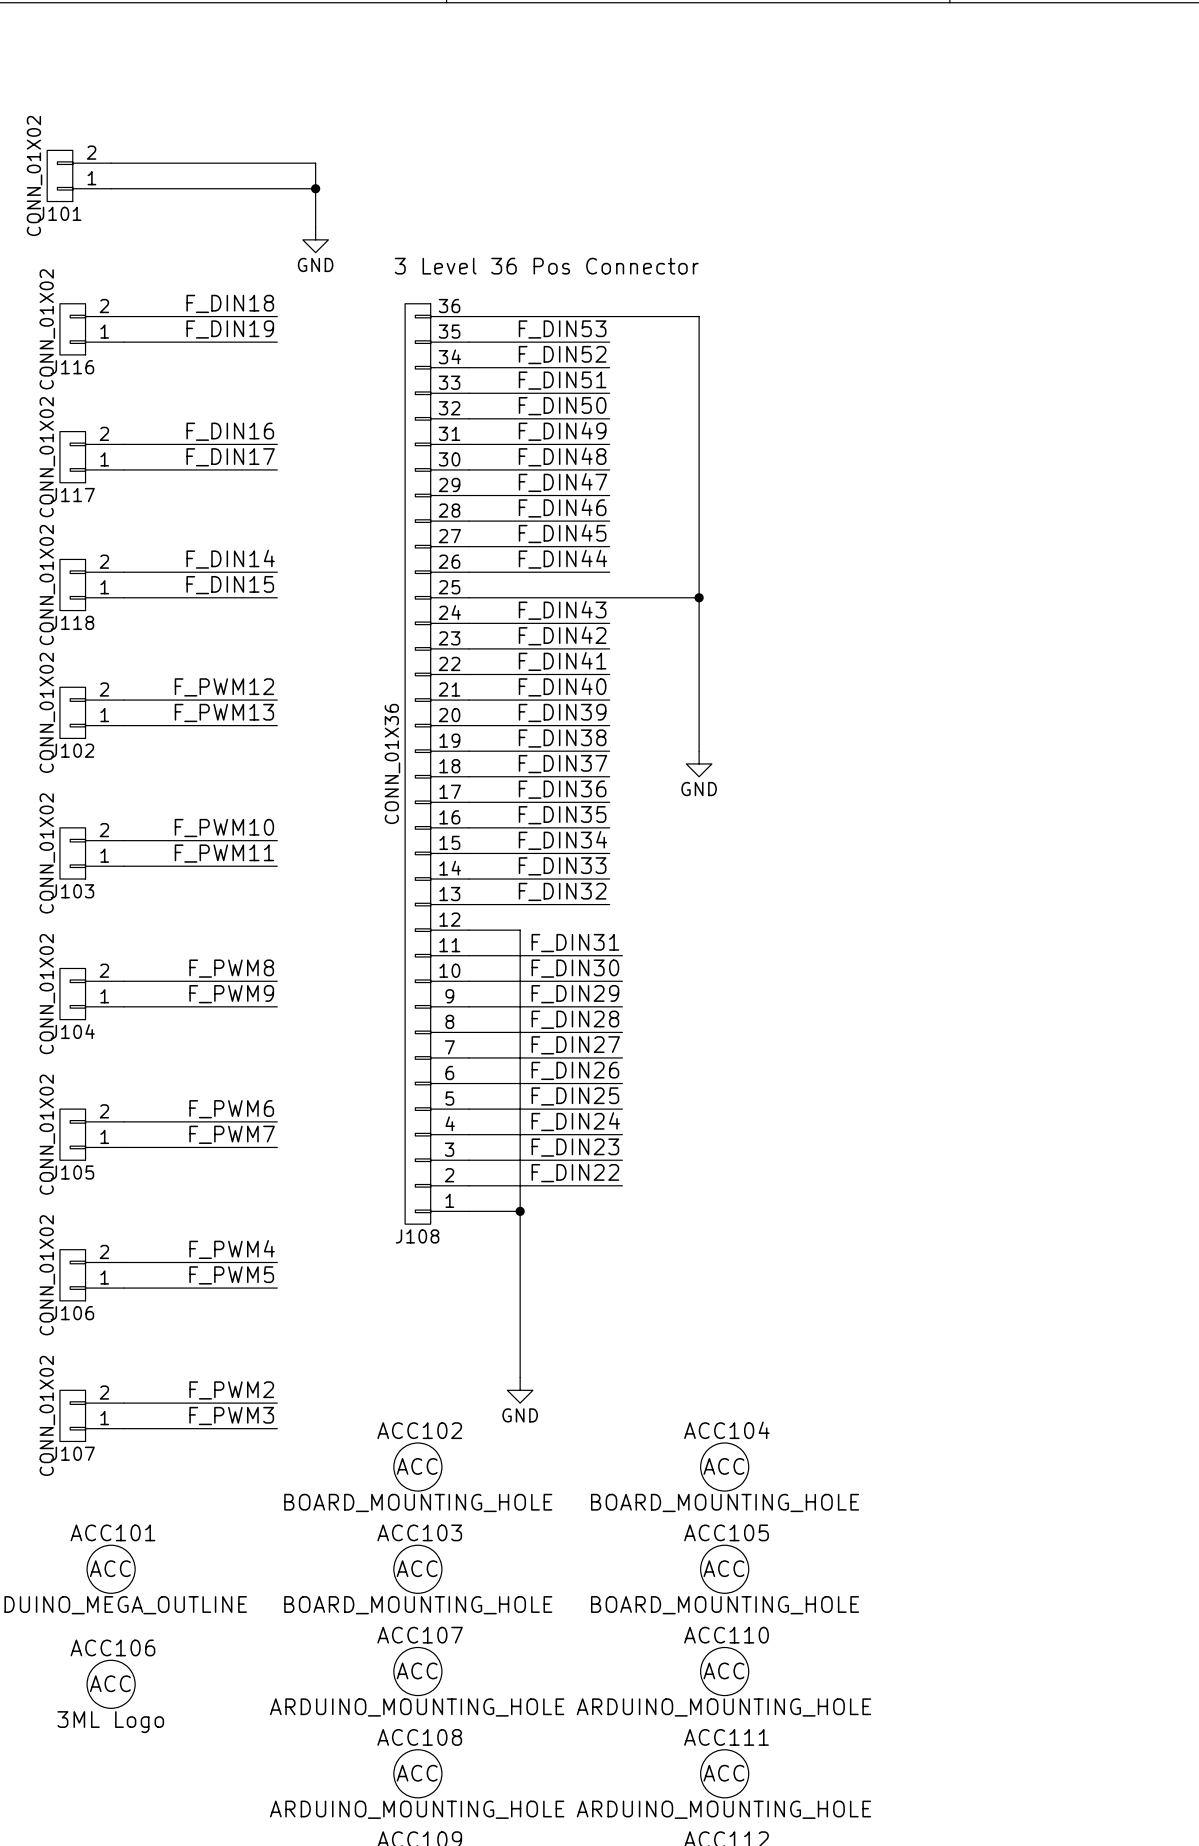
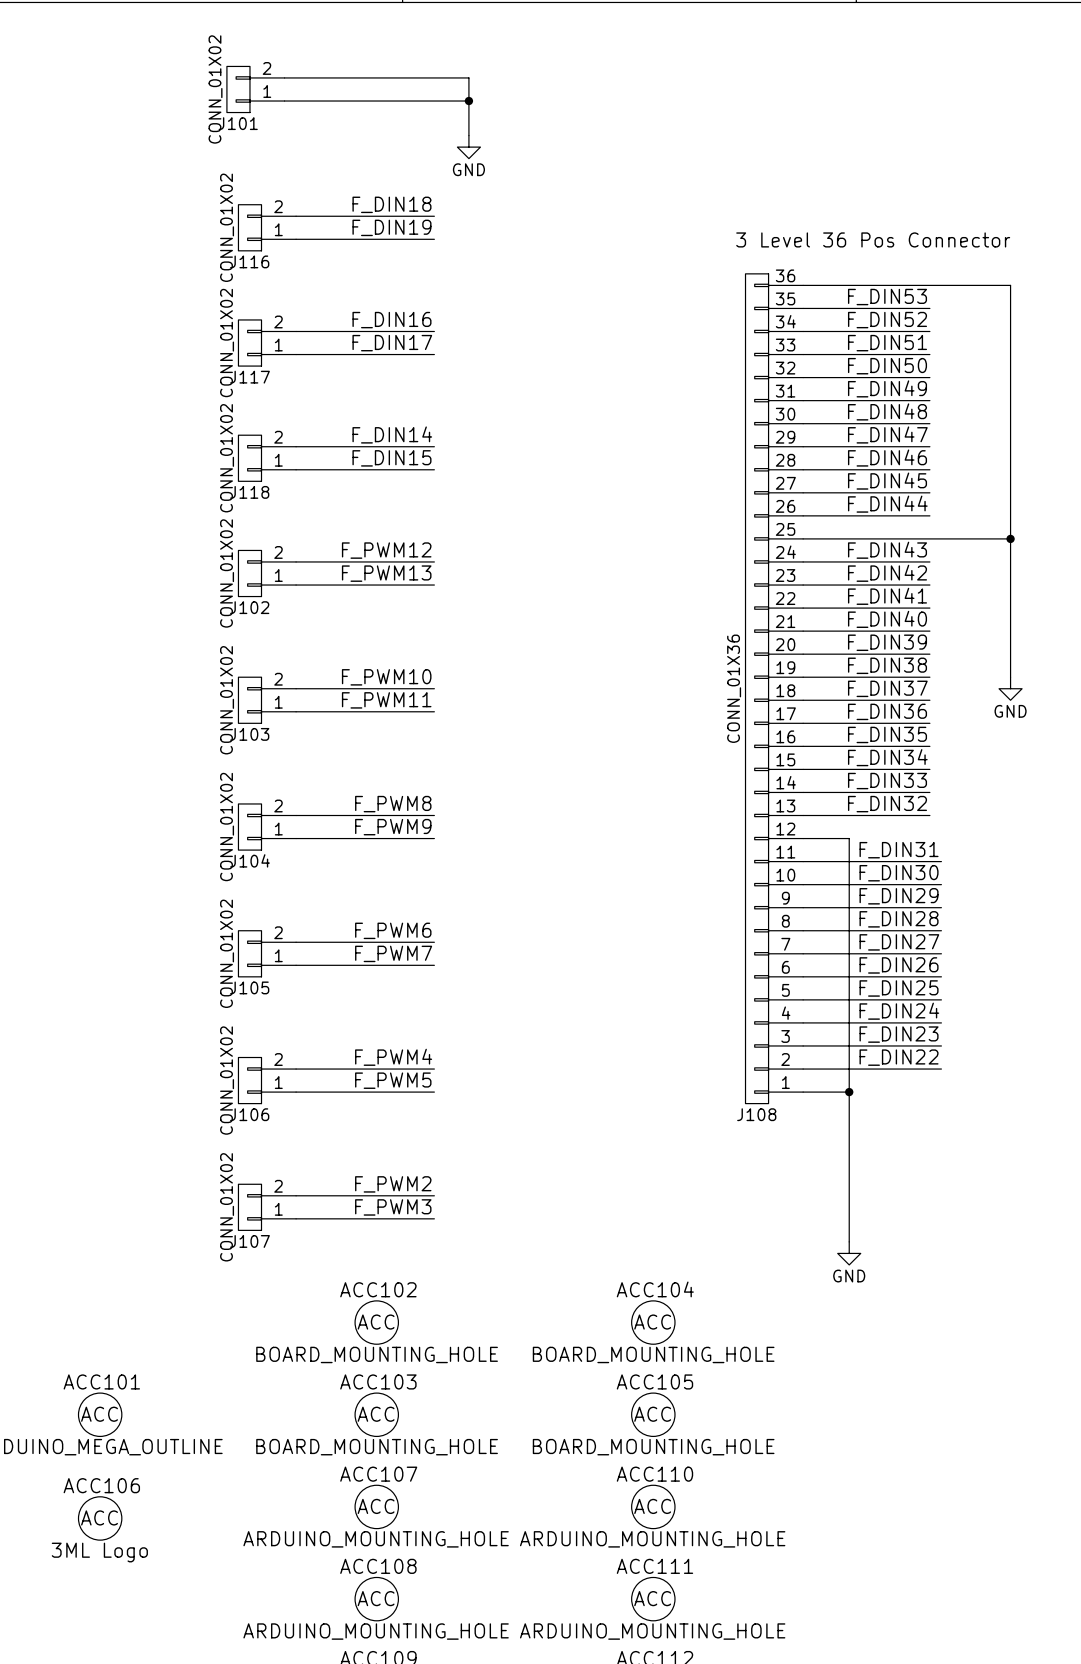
junction: none -> (468, 101)
wire: (111, 163) (315, 163) (315, 227) -> (284, 77) (468, 77) (468, 135)
J101 position: (79, 175) -> (255, 89)
wire: (111, 188) (315, 188) -> (284, 101) (468, 101)
junction: (315, 188) -> none
power symbol position: GND (315, 239) -> GND (468, 147)
text: 3 Level 36 Pos Connector (546, 266) -> none
text: none -> 3 Level 36 Pos Connector (873, 239)
label position: F_DIN18 (230, 303) -> F_DIN18 (391, 204)
wire: (123, 316) (277, 316) -> (296, 216) (434, 216)
wire: (469, 316) (699, 316) (699, 751) -> none
wire: none -> (803, 285) (1010, 285) (1010, 677)
J116 position: (91, 329) -> (267, 227)
label position: F_DIN19 (230, 329) -> F_DIN19 (391, 227)
label: F_DIN53 (562, 329) -> none
label: none -> F_DIN53 (887, 297)
wire: (123, 342) (277, 342) -> (296, 239) (434, 239)
wire: (469, 342) (609, 342) -> (296, 354) (422, 354)
wire: none -> (803, 308) (929, 308)
label: F_DIN52 (562, 355) -> none
label: none -> F_DIN52 (887, 320)
wire: (481, 367) (609, 367) -> none
wire: none -> (803, 331) (929, 331)
label: F_DIN51 (562, 380) -> none
label: none -> F_DIN51 (887, 343)
wire: (481, 393) (609, 393) -> none
wire: none -> (803, 354) (929, 354)
label: F_DIN50 (562, 406) -> none
label: none -> F_DIN50 (887, 366)
wire: (469, 418) (609, 418) -> (296, 331) (422, 331)
wire: none -> (803, 377) (929, 377)
label position: F_DIN16 (230, 431) -> F_DIN16 (391, 320)
label: F_DIN49 (562, 431) -> none
label: none -> F_DIN49 (887, 388)
wire: (123, 444) (277, 444) -> none
wire: (469, 444) (609, 444) -> (296, 446) (422, 446)
wire: none -> (803, 400) (929, 400)
label: F_DIN48 (562, 456) -> none
label: none -> F_DIN48 (887, 411)
J117 position: (91, 457) -> (267, 343)
label position: F_DIN17 (230, 457) -> F_DIN17 (392, 343)
wire: (123, 469) (277, 469) -> none
wire: (469, 469) (609, 469) -> (296, 469) (422, 469)
wire: none -> (803, 423) (929, 423)
label: F_DIN47 (562, 482) -> none
label: none -> F_DIN47 (887, 434)
wire: (481, 495) (609, 495) -> none
wire: none -> (803, 446) (929, 446)
label: F_DIN46 (562, 508) -> none
label: none -> F_DIN46 (887, 458)
wire: (481, 521) (609, 521) -> none
wire: none -> (803, 469) (929, 469)
label: F_DIN45 (562, 533) -> none
label: none -> F_DIN45 (887, 481)
wire: (469, 546) (609, 546) -> none
wire: none -> (803, 492) (929, 492)
label position: F_DIN14 (230, 559) -> F_DIN14 (392, 434)
label: F_DIN44 (562, 559) -> none
label: none -> F_DIN44 (887, 504)
wire: (123, 572) (277, 572) -> none
wire: (469, 572) (609, 572) -> (296, 561) (422, 561)
wire: none -> (803, 515) (929, 515)
J118 position: (91, 585) -> (267, 458)
label position: F_DIN15 (230, 585) -> F_DIN15 (391, 458)
wire: (123, 597) (277, 597) -> none
wire: (469, 597) (699, 597) -> none
junction: (699, 597) -> none
wire: none -> (803, 538) (1010, 538)
junction: none -> (1010, 538)
label: F_DIN43 (562, 610) -> none
label: none -> F_DIN43 (887, 550)
wire: (481, 623) (609, 623) -> none
wire: none -> (803, 561) (929, 561)
label: F_DIN42 (562, 635) -> none
label: none -> F_DIN42 (887, 573)
wire: (481, 648) (609, 648) -> none
wire: none -> (803, 585) (929, 585)
label: F_DIN41 (562, 661) -> none
label: none -> F_DIN41 (887, 596)
wire: (469, 674) (609, 674) -> none
wire: none -> (803, 608) (929, 608)
label position: F_PWM12 (224, 687) -> F_PWM12 (386, 550)
label: F_DIN40 (562, 687) -> none
label: none -> F_DIN40 (887, 619)
wire: (123, 700) (277, 700) -> none
wire: (469, 700) (609, 700) -> (296, 585) (422, 585)
wire: none -> (803, 631) (929, 631)
J102 position: (91, 712) -> (267, 573)
label position: F_PWM13 (224, 712) -> F_PWM13 (386, 573)
label: F_DIN39 (562, 712) -> none
label: none -> F_DIN39 (887, 642)
wire: (123, 725) (277, 725) -> none
wire: (469, 725) (609, 725) -> none
wire: none -> (803, 654) (929, 654)
label: F_DIN38 (562, 738) -> none
label: none -> F_DIN38 (887, 665)
wire: (469, 751) (609, 751) -> none
wire: none -> (803, 677) (929, 677)
J108 position: (437, 763) -> (774, 688)
power symbol: GND (699, 763) -> none
power symbol: none -> GND (1010, 688)
label: F_DIN37 (562, 764) -> none
label: none -> F_DIN37 (887, 688)
wire: (469, 776) (609, 776) -> none
wire: none -> (803, 700) (929, 700)
label: F_DIN36 (562, 789) -> none
label: none -> F_DIN36 (887, 711)
wire: (469, 802) (609, 802) -> none
wire: none -> (803, 723) (929, 723)
label: F_DIN35 (562, 815) -> none
label: none -> F_DIN35 (887, 734)
wire: (469, 827) (609, 827) -> none
wire: none -> (803, 746) (929, 746)
label position: F_PWM10 (224, 828) -> F_PWM10 (386, 677)
wire: (123, 840) (277, 840) -> (296, 688) (434, 688)
label: F_DIN34 (562, 840) -> none
label: none -> F_DIN34 (887, 757)
J103 position: (91, 853) -> (267, 700)
label position: F_PWM11 (224, 853) -> F_PWM11 (386, 700)
wire: (469, 853) (609, 853) -> (296, 815) (422, 815)
wire: none -> (803, 769) (929, 769)
wire: (123, 866) (277, 866) -> (296, 711) (434, 711)
label: F_DIN33 (562, 866) -> none
label: none -> F_DIN33 (887, 781)
wire: (469, 879) (609, 879) -> (296, 838) (422, 838)
wire: none -> (803, 792) (929, 792)
label: F_DIN32 (562, 891) -> none
label: none -> F_DIN32 (887, 804)
wire: (481, 904) (609, 904) -> none
wire: none -> (803, 815) (929, 815)
wire: (481, 930) (520, 930) (520, 1377) -> none
wire: none -> (803, 838) (849, 838) (849, 1241)
label: F_DIN31 (575, 943) -> none
label: none -> F_DIN31 (899, 850)
wire: (469, 955) (622, 955) -> none
wire: none -> (803, 861) (941, 861)
label position: F_PWM8 (231, 968) -> F_PWM8 (393, 804)
label: F_DIN30 (575, 968) -> none
label: none -> F_DIN30 (899, 873)
wire: (123, 981) (277, 981) -> none
wire: (469, 981) (622, 981) -> none
wire: none -> (803, 884) (941, 884)
J104 position: (91, 994) -> (267, 827)
label position: F_PWM9 (231, 994) -> F_PWM9 (393, 827)
label: F_DIN29 (575, 994) -> none
label: none -> F_DIN29 (899, 896)
wire: (123, 1006) (277, 1006) -> none
wire: (469, 1006) (622, 1006) -> none
wire: none -> (803, 907) (941, 907)
label: F_DIN28 (575, 1019) -> none
label: none -> F_DIN28 (899, 919)
wire: (469, 1032) (622, 1032) -> none
wire: none -> (803, 930) (941, 930)
label: F_DIN27 (575, 1045) -> none
label: none -> F_DIN27 (899, 942)
wire: (469, 1057) (622, 1057) -> none
wire: none -> (803, 953) (941, 953)
label: F_DIN26 (575, 1070) -> none
label: none -> F_DIN26 (899, 965)
wire: (469, 1083) (622, 1083) -> none
wire: none -> (803, 976) (941, 976)
label: F_DIN25 (575, 1096) -> none
label: none -> F_DIN25 (899, 988)
label position: F_PWM6 (231, 1109) -> F_PWM6 (393, 930)
wire: (469, 1109) (622, 1109) -> none
wire: none -> (803, 999) (941, 999)
wire: (123, 1121) (277, 1121) -> (296, 942) (434, 942)
label: F_DIN24 (575, 1121) -> none
label: none -> F_DIN24 (899, 1011)
J105 position: (91, 1134) -> (267, 953)
label position: F_PWM7 (232, 1134) -> F_PWM7 (393, 953)
wire: (469, 1134) (622, 1134) -> none
wire: none -> (803, 1022) (941, 1022)
wire: (123, 1147) (277, 1147) -> (296, 965) (434, 965)
label: F_DIN23 (575, 1147) -> none
label: none -> F_DIN23 (899, 1034)
wire: (469, 1160) (622, 1160) -> none
wire: none -> (803, 1045) (941, 1045)
label: F_DIN22 (575, 1173) -> none
label: none -> F_DIN22 (899, 1057)
wire: (481, 1185) (622, 1185) -> (296, 1069) (422, 1069)
wire: none -> (803, 1069) (941, 1069)
wire: none -> (296, 1092) (422, 1092)
wire: (481, 1211) (520, 1211) -> none
junction: (520, 1211) -> none
wire: none -> (803, 1092) (849, 1092)
junction: none -> (849, 1092)
label position: F_PWM4 (232, 1249) -> F_PWM4 (393, 1057)
wire: (123, 1262) (277, 1262) -> none
J106 position: (91, 1275) -> (267, 1080)
label position: F_PWM5 (231, 1275) -> F_PWM5 (393, 1080)
wire: (123, 1288) (277, 1288) -> none
label position: F_PWM2 (231, 1390) -> F_PWM2 (393, 1184)
power symbol: GND (520, 1390) -> none
power symbol: none -> GND (849, 1253)
wire: (123, 1403) (277, 1403) -> (296, 1195) (434, 1195)
J107 position: (91, 1415) -> (267, 1207)
label position: F_PWM3 (231, 1416) -> F_PWM3 (393, 1207)
wire: (123, 1428) (277, 1428) -> (296, 1218) (434, 1218)

